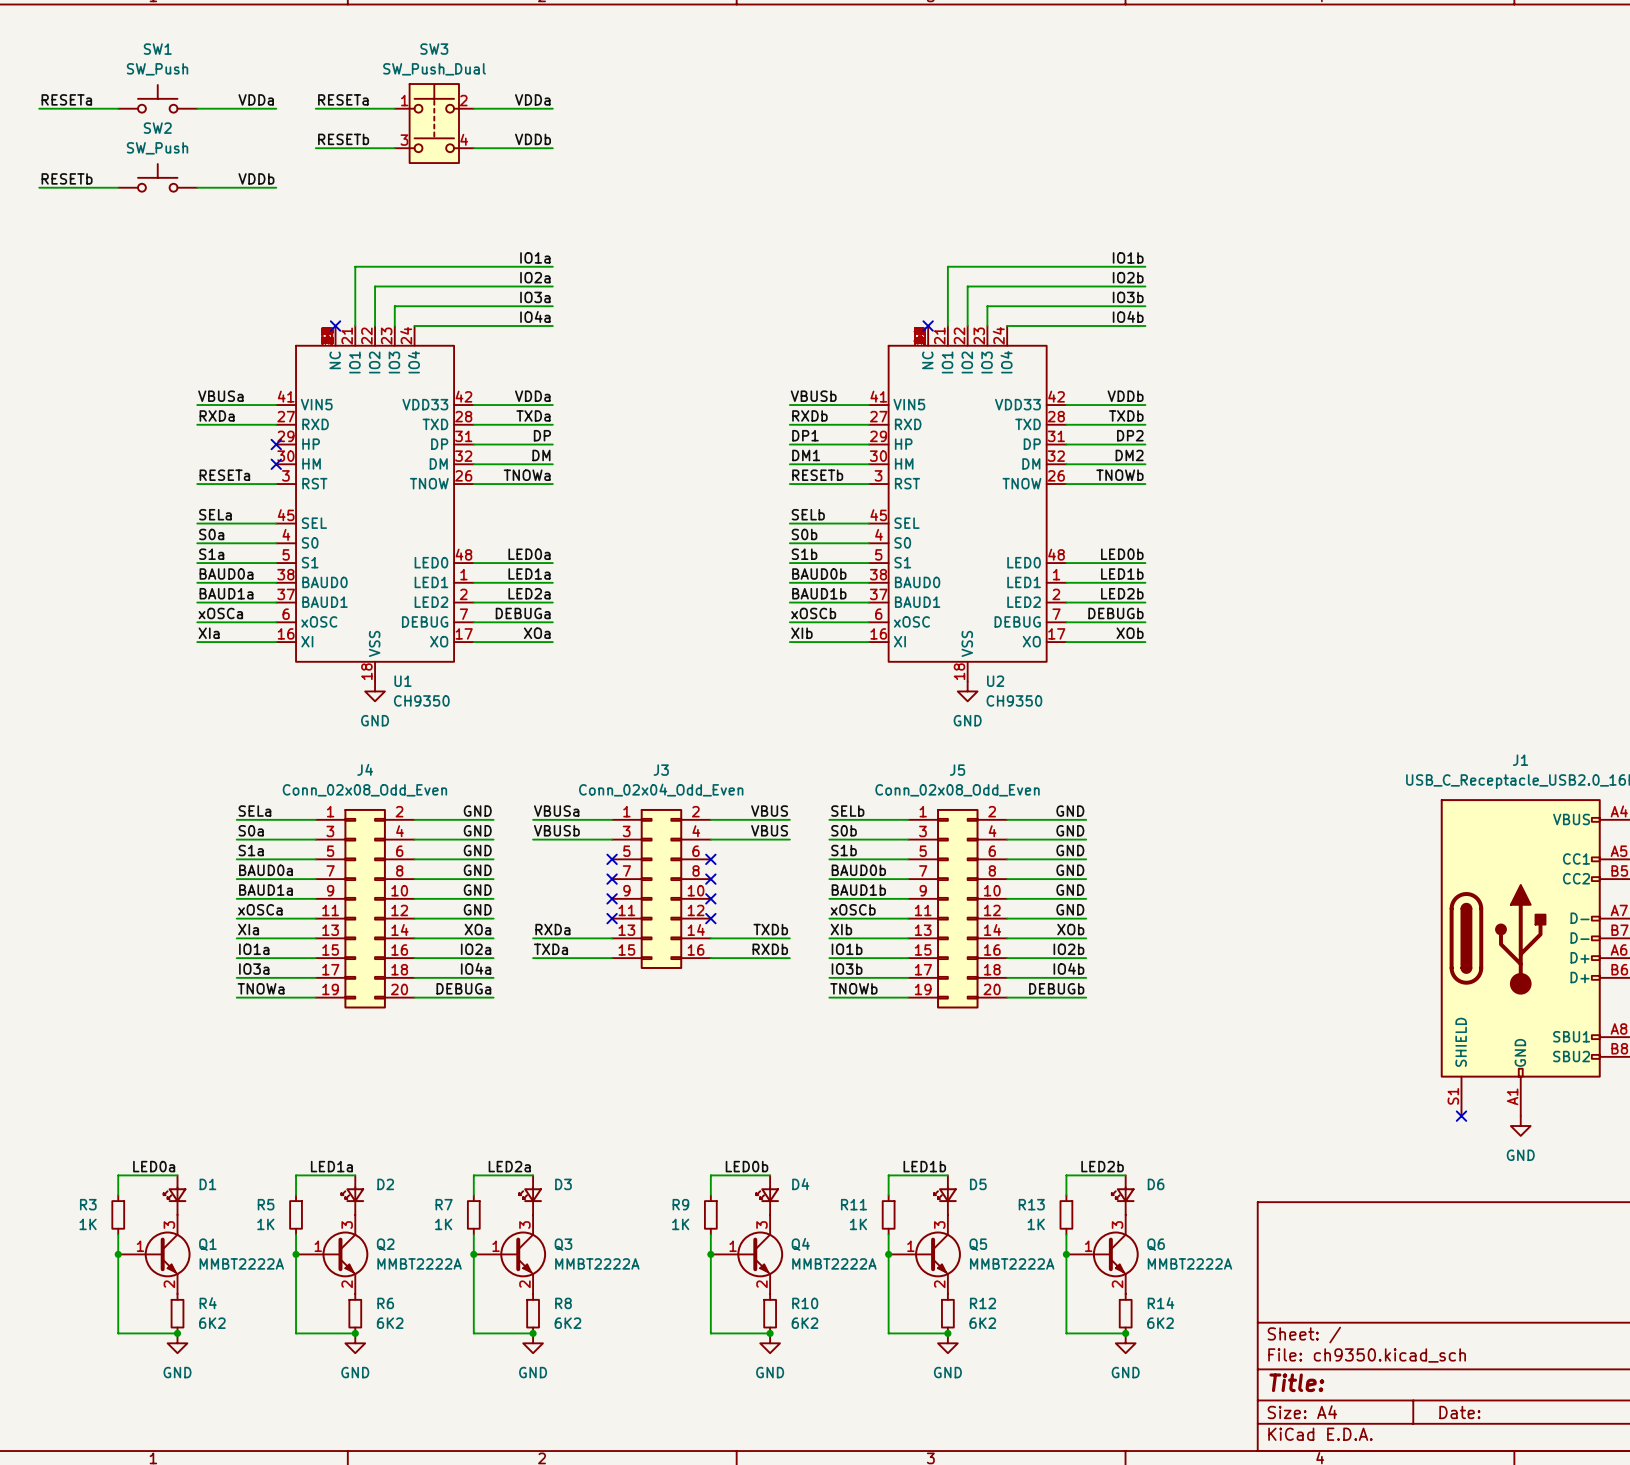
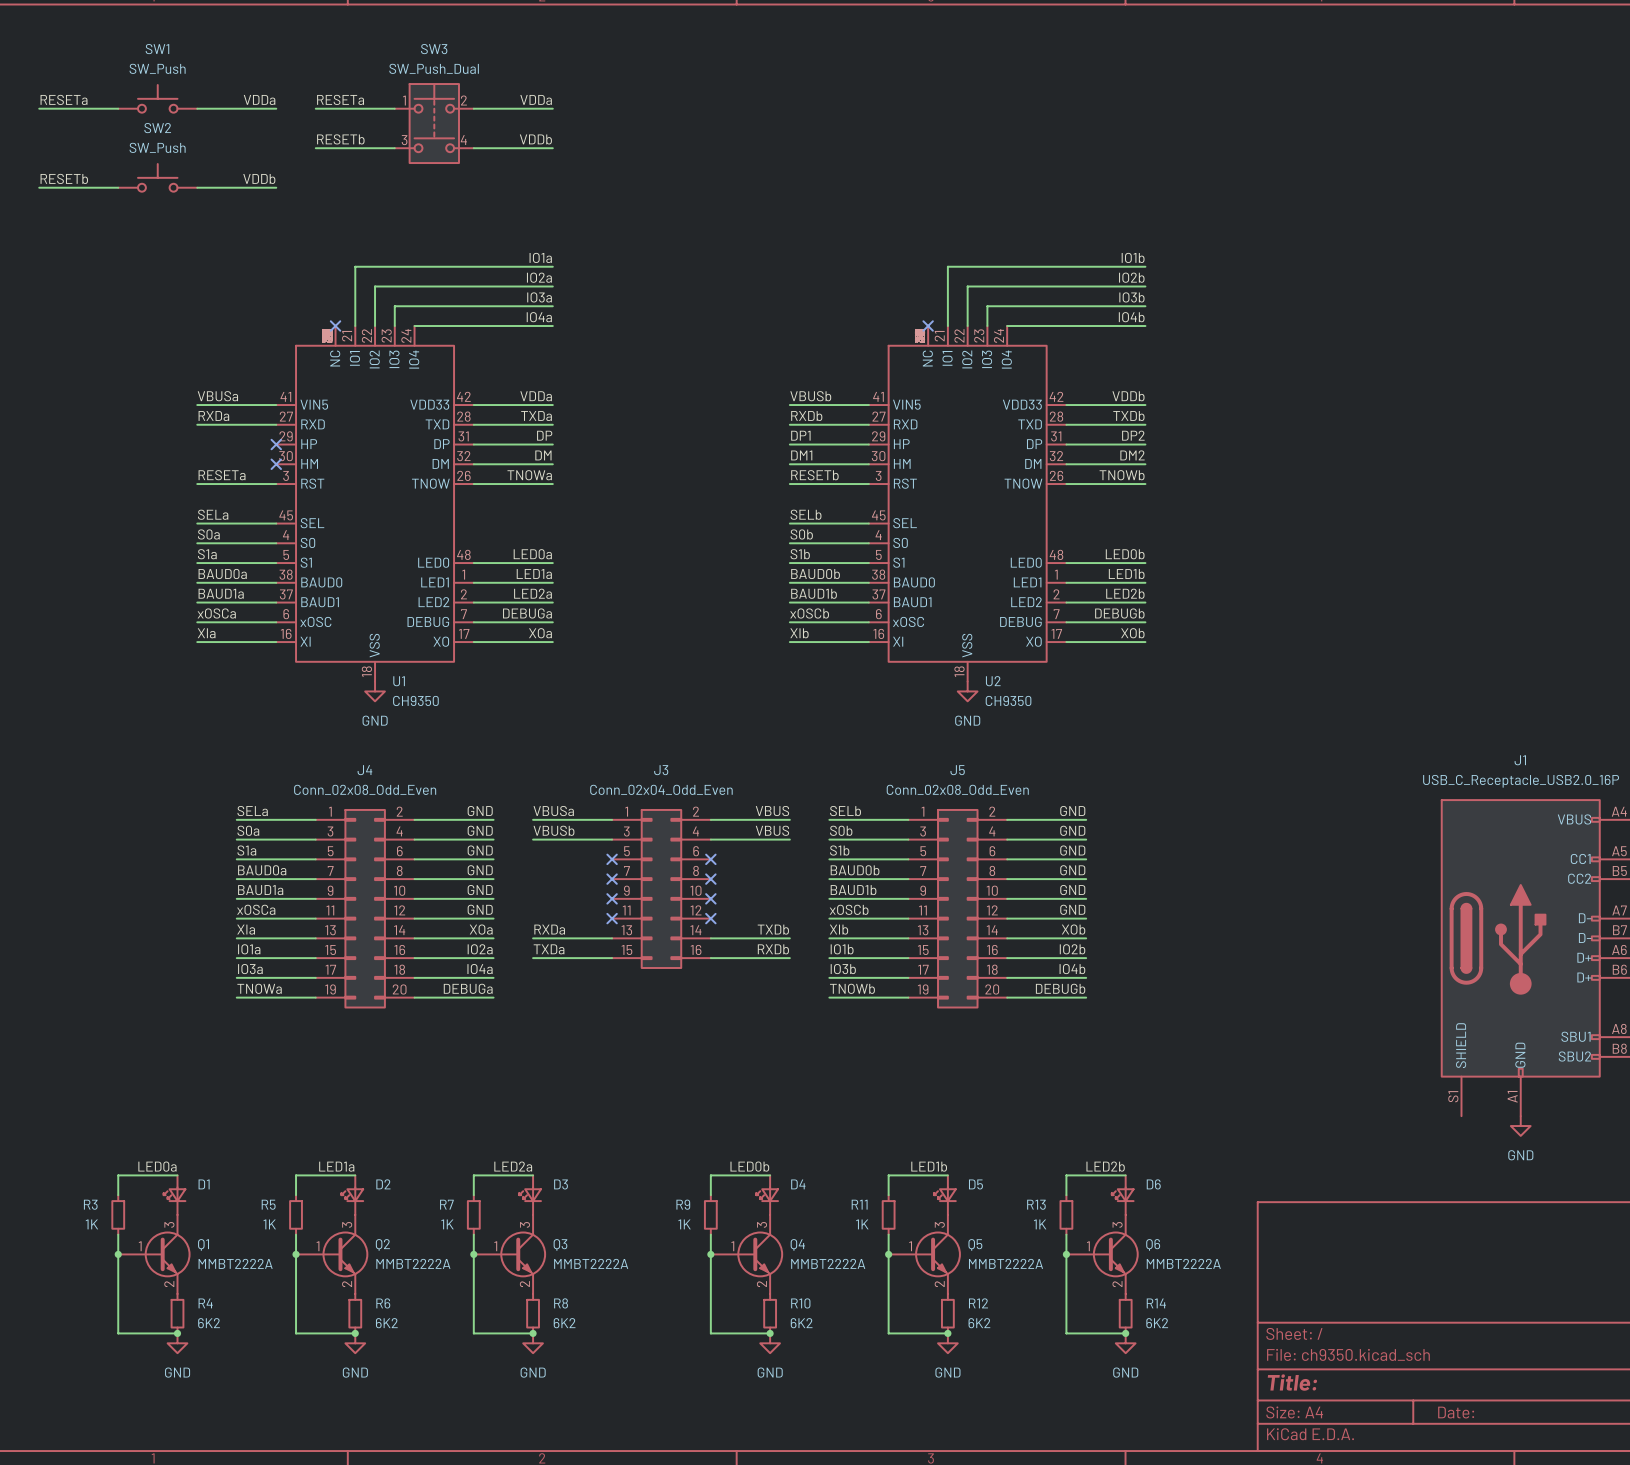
no-connect mark: (1461, 1116) -> none

